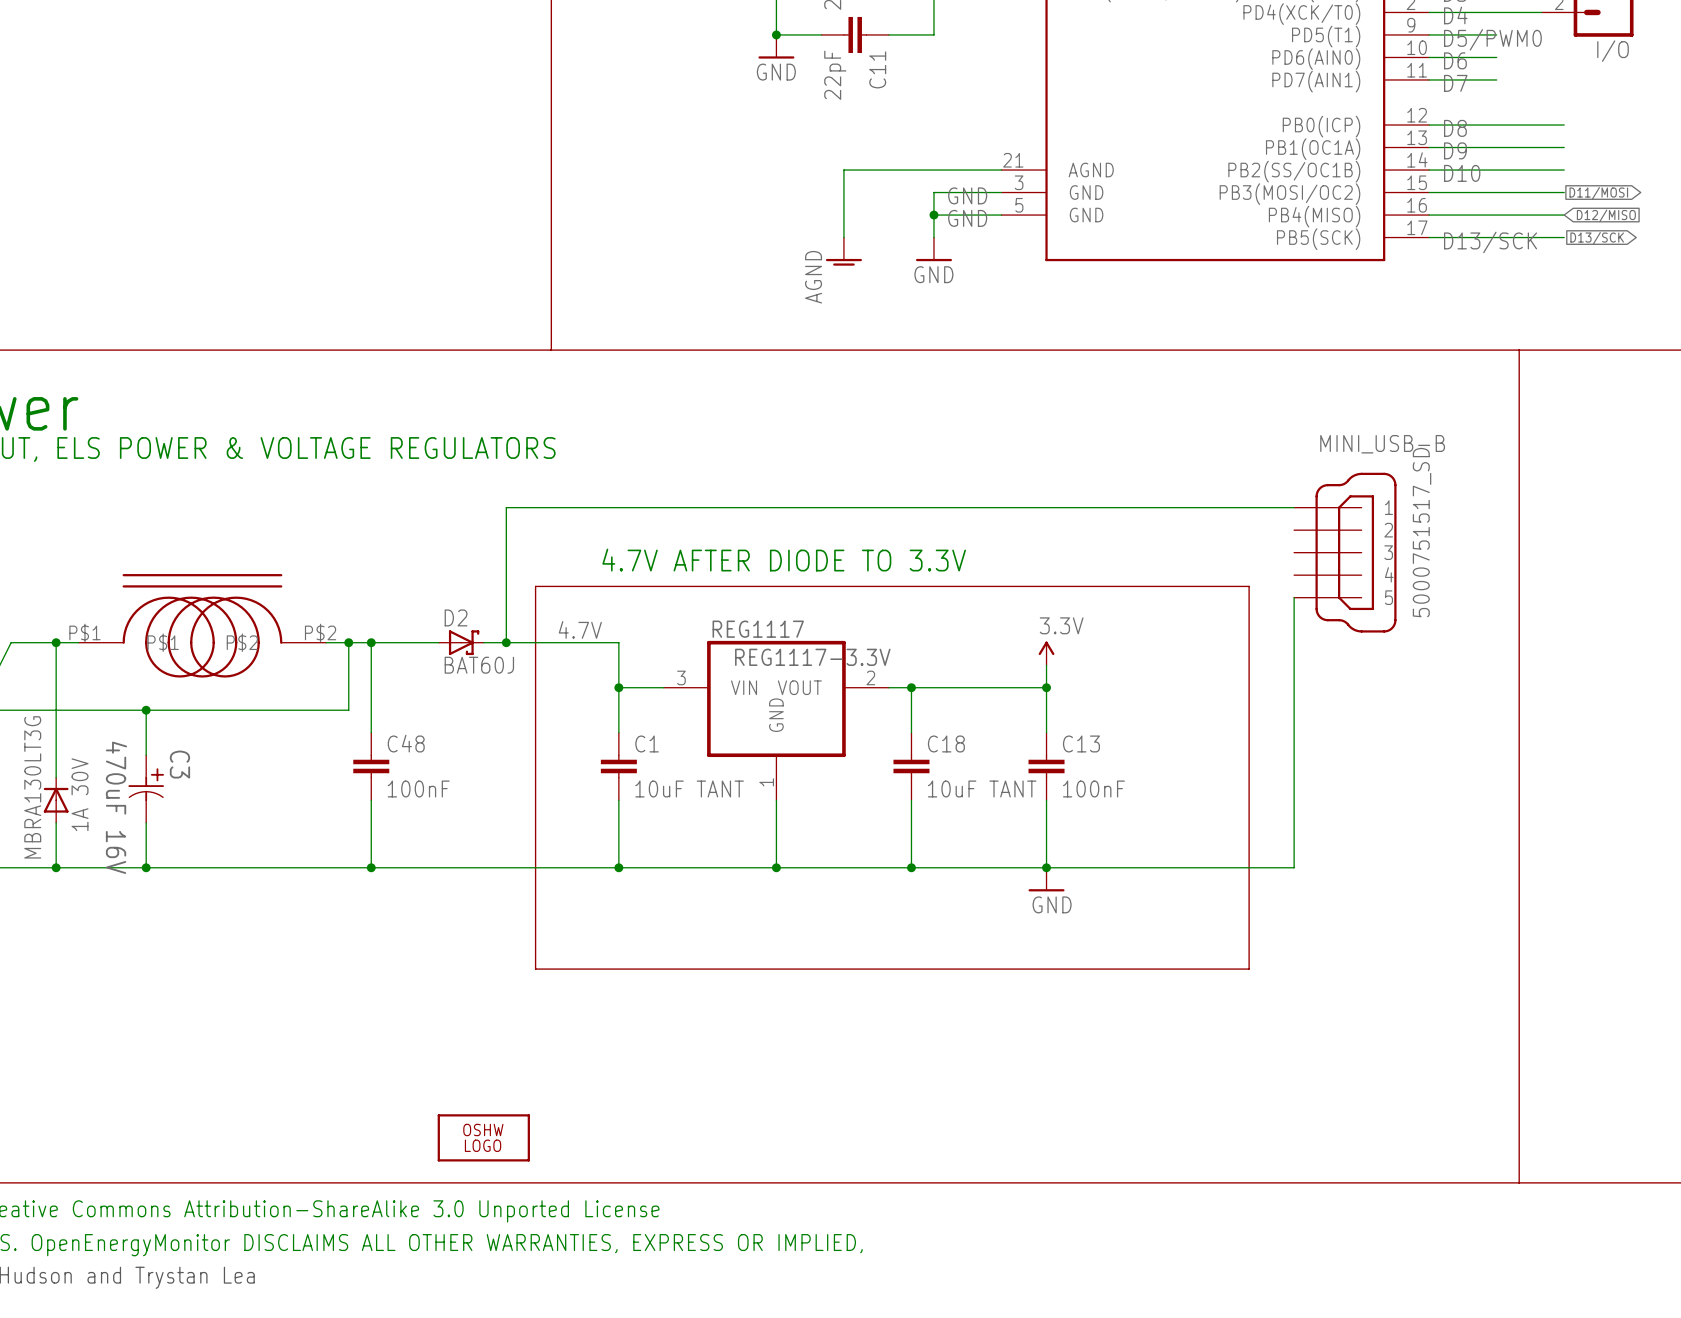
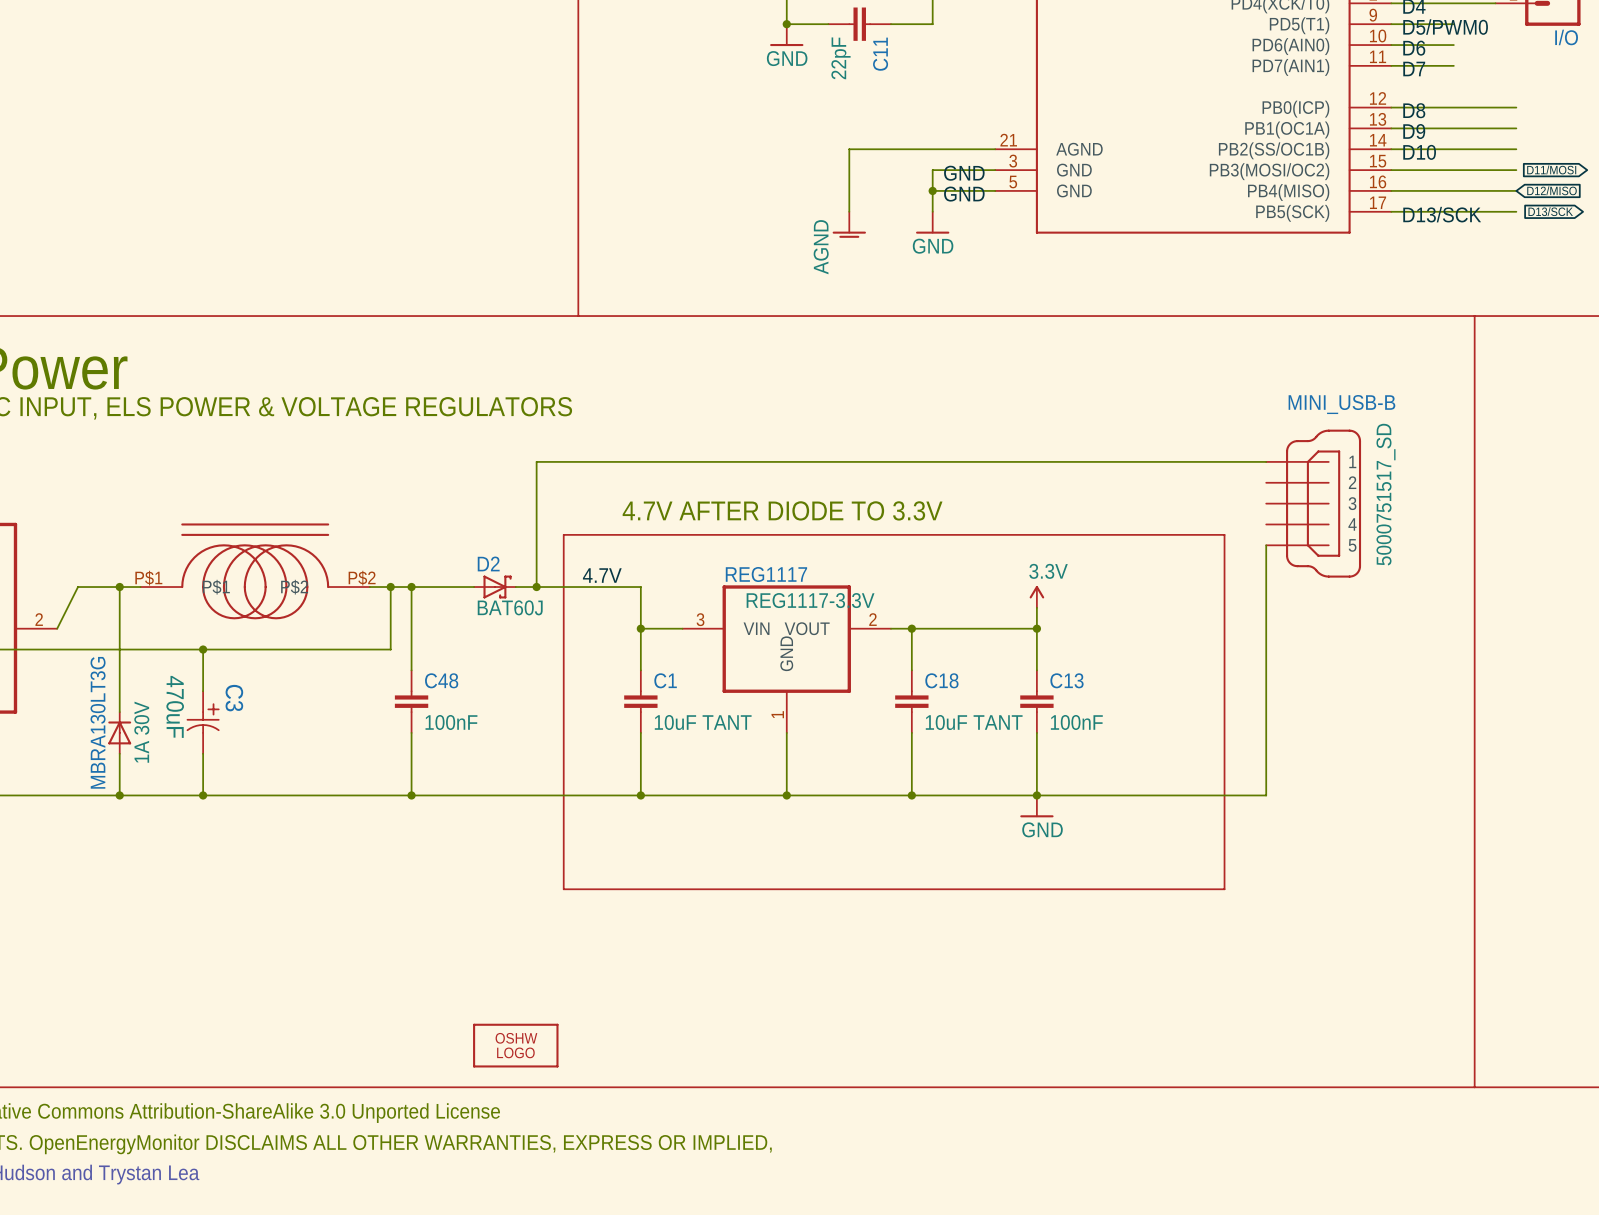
C3 value: 470uF 16V (116, 807) -> 470uF (175, 706)

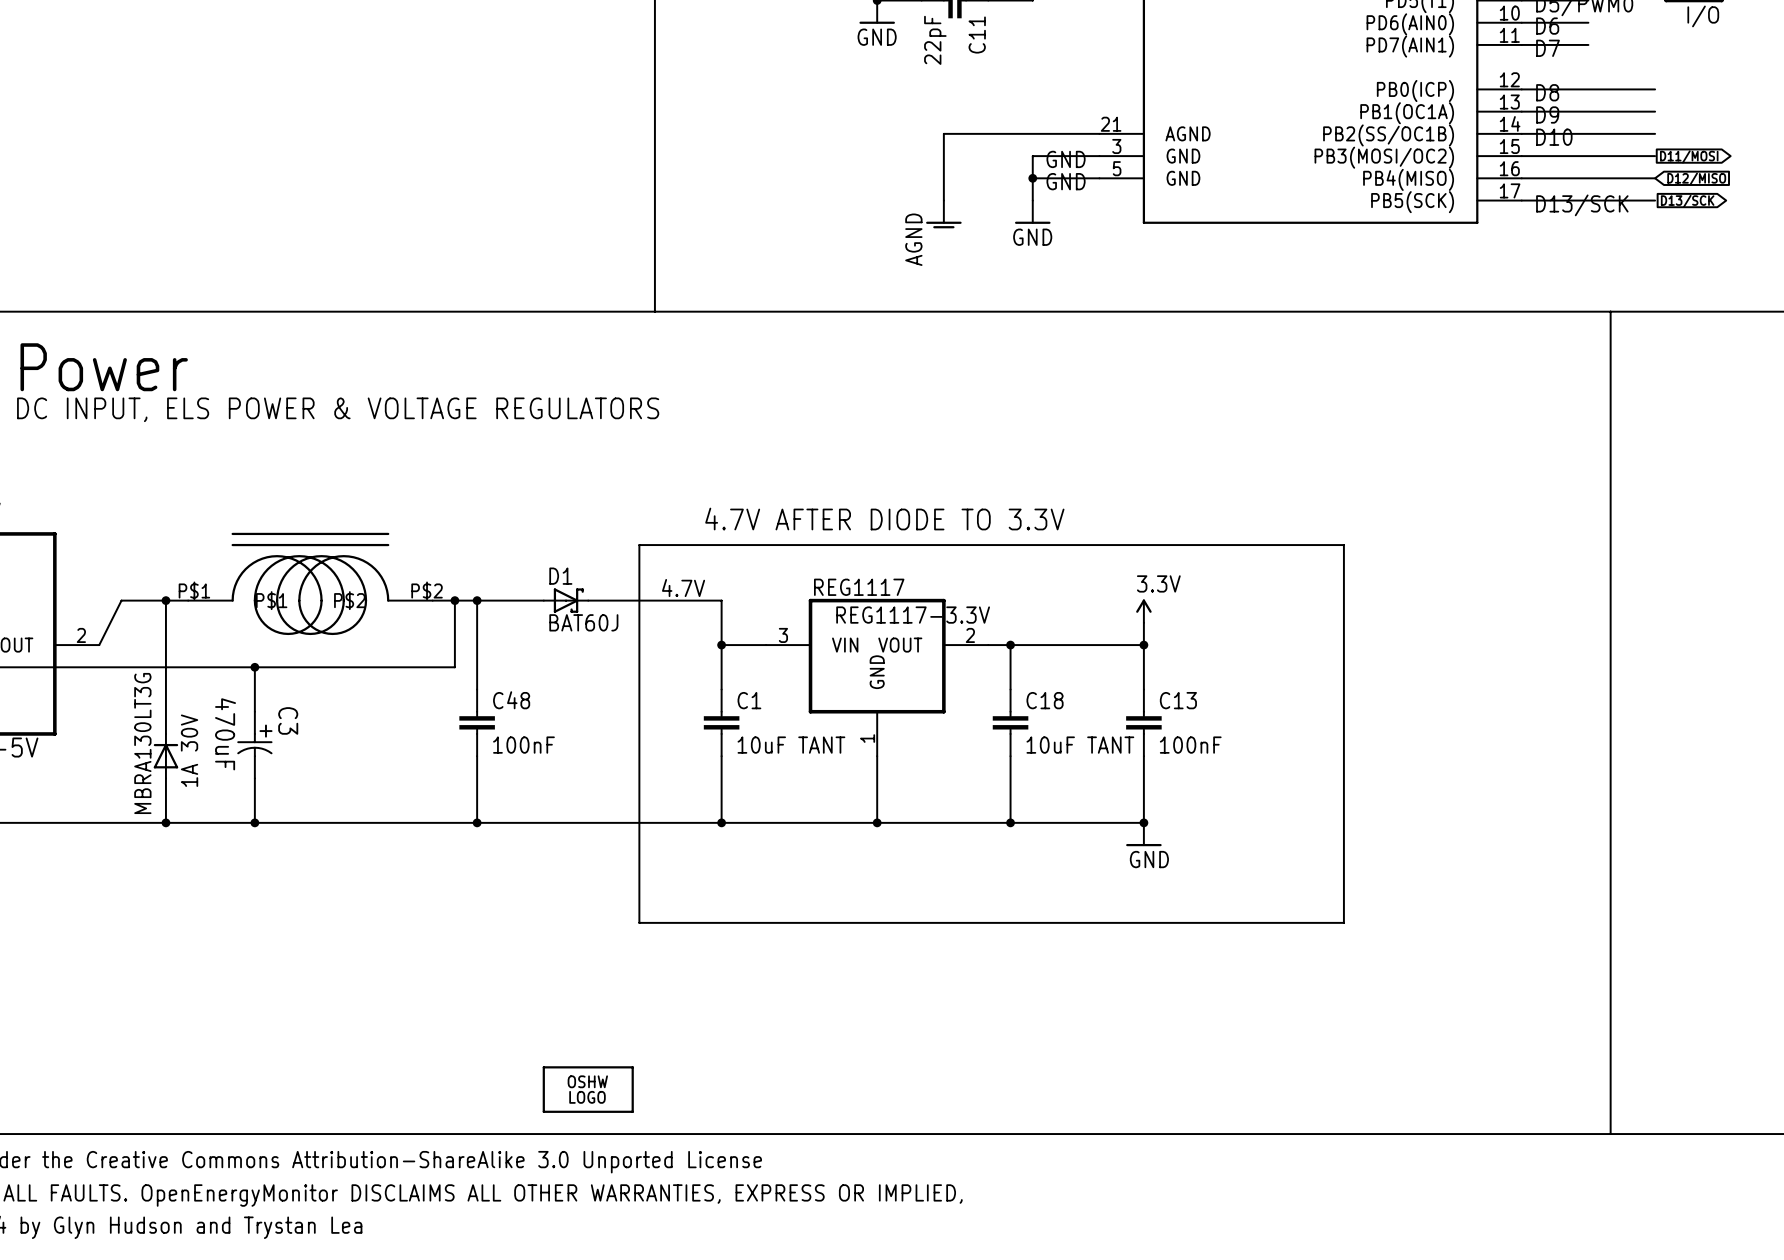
wire: (1266, 461) (536, 461) (536, 587) -> none
MINI_USB-B: 5000751517_SD (1313, 503) -> none
wire: (1266, 545) (1266, 795) (1036, 795) -> none
D2 name: D2 (488, 563) -> D1 (560, 576)
junction: (536, 587) -> none

